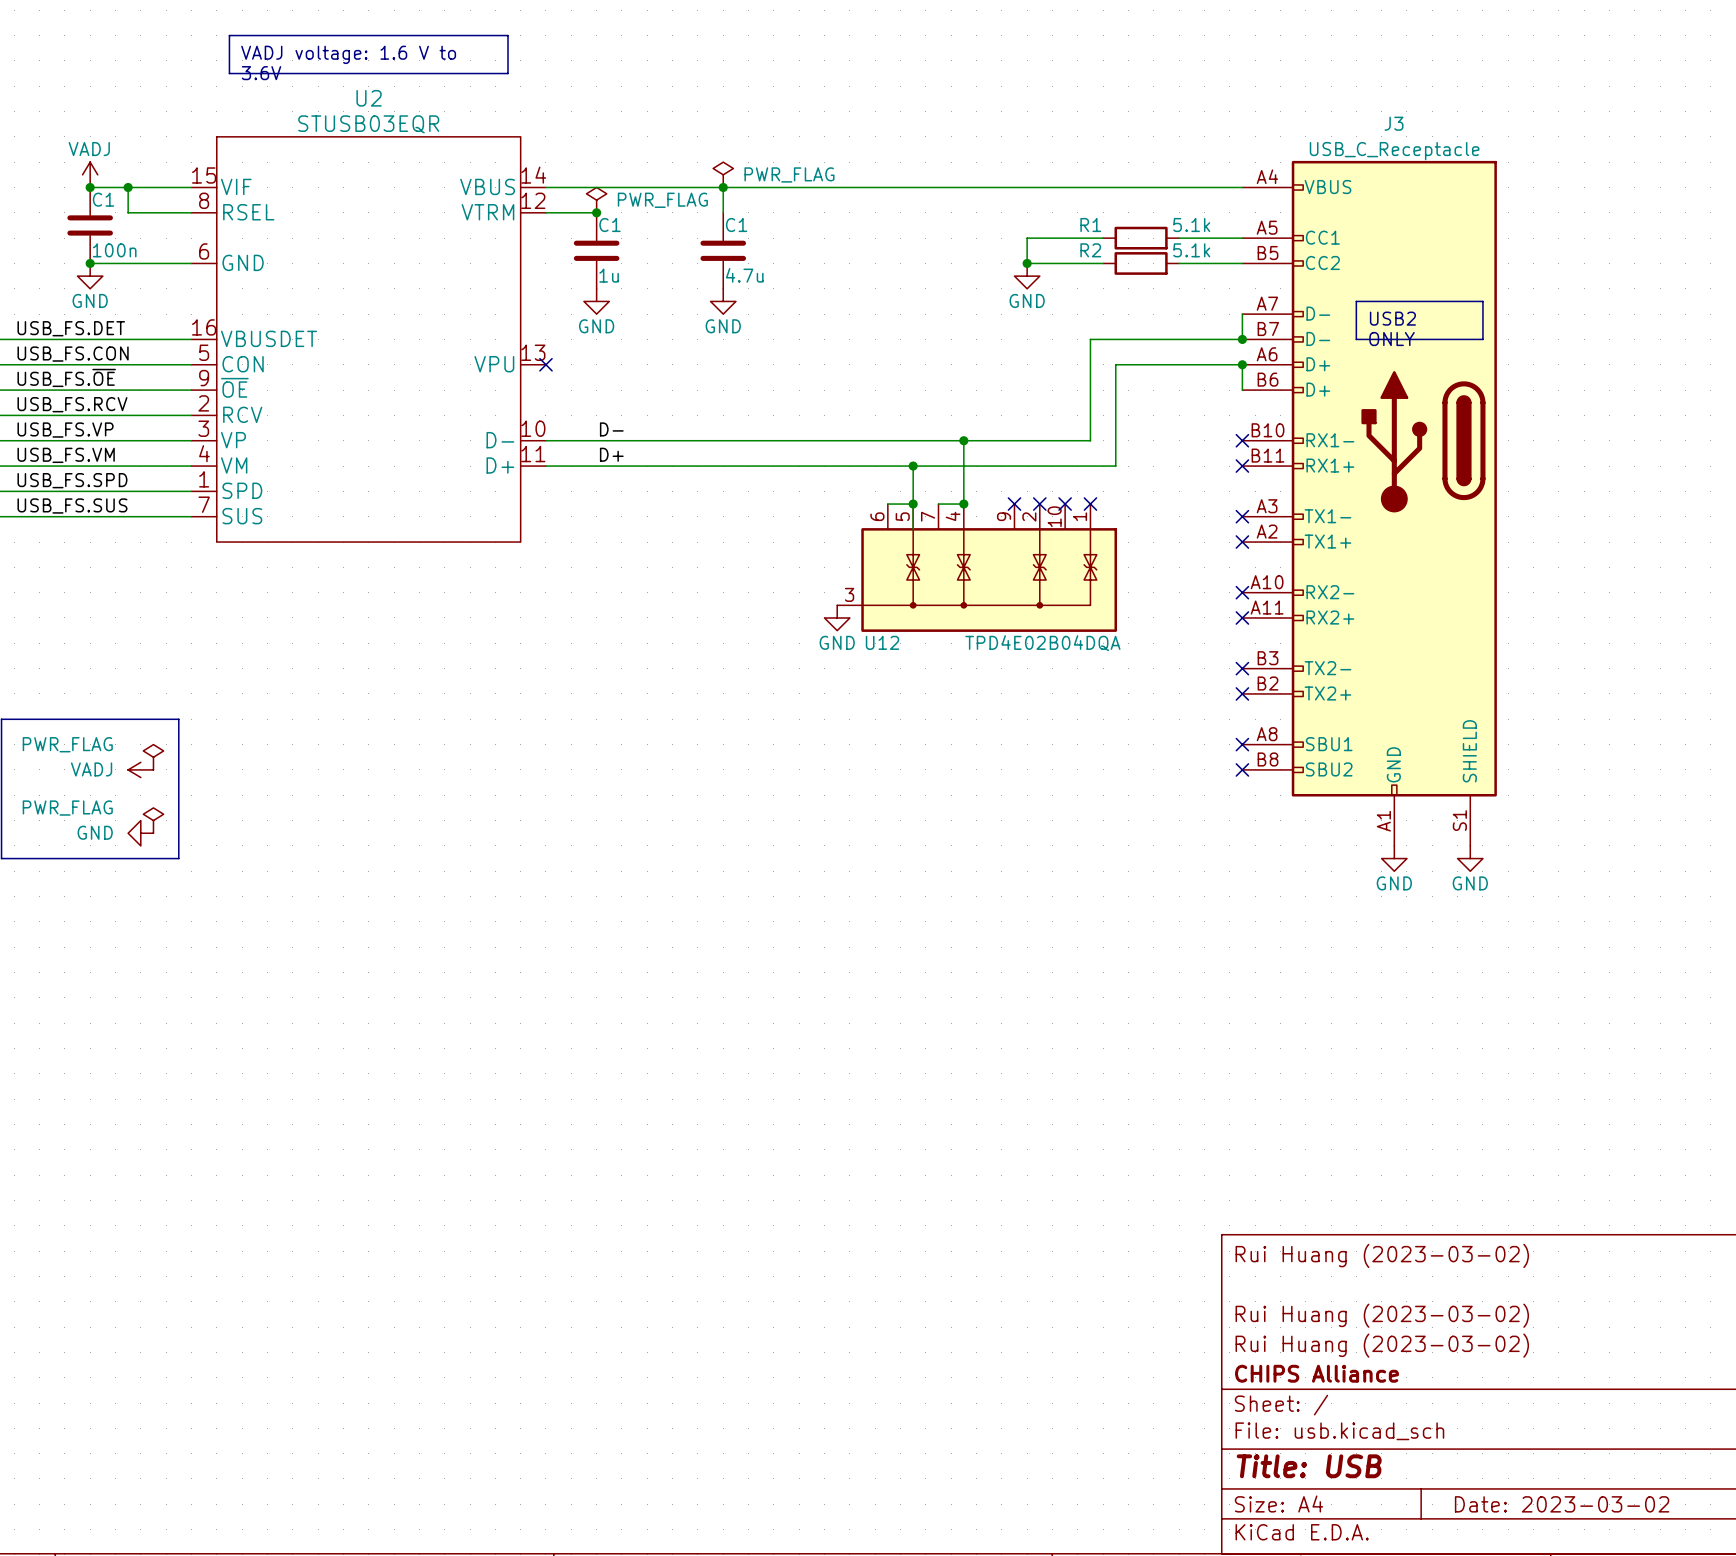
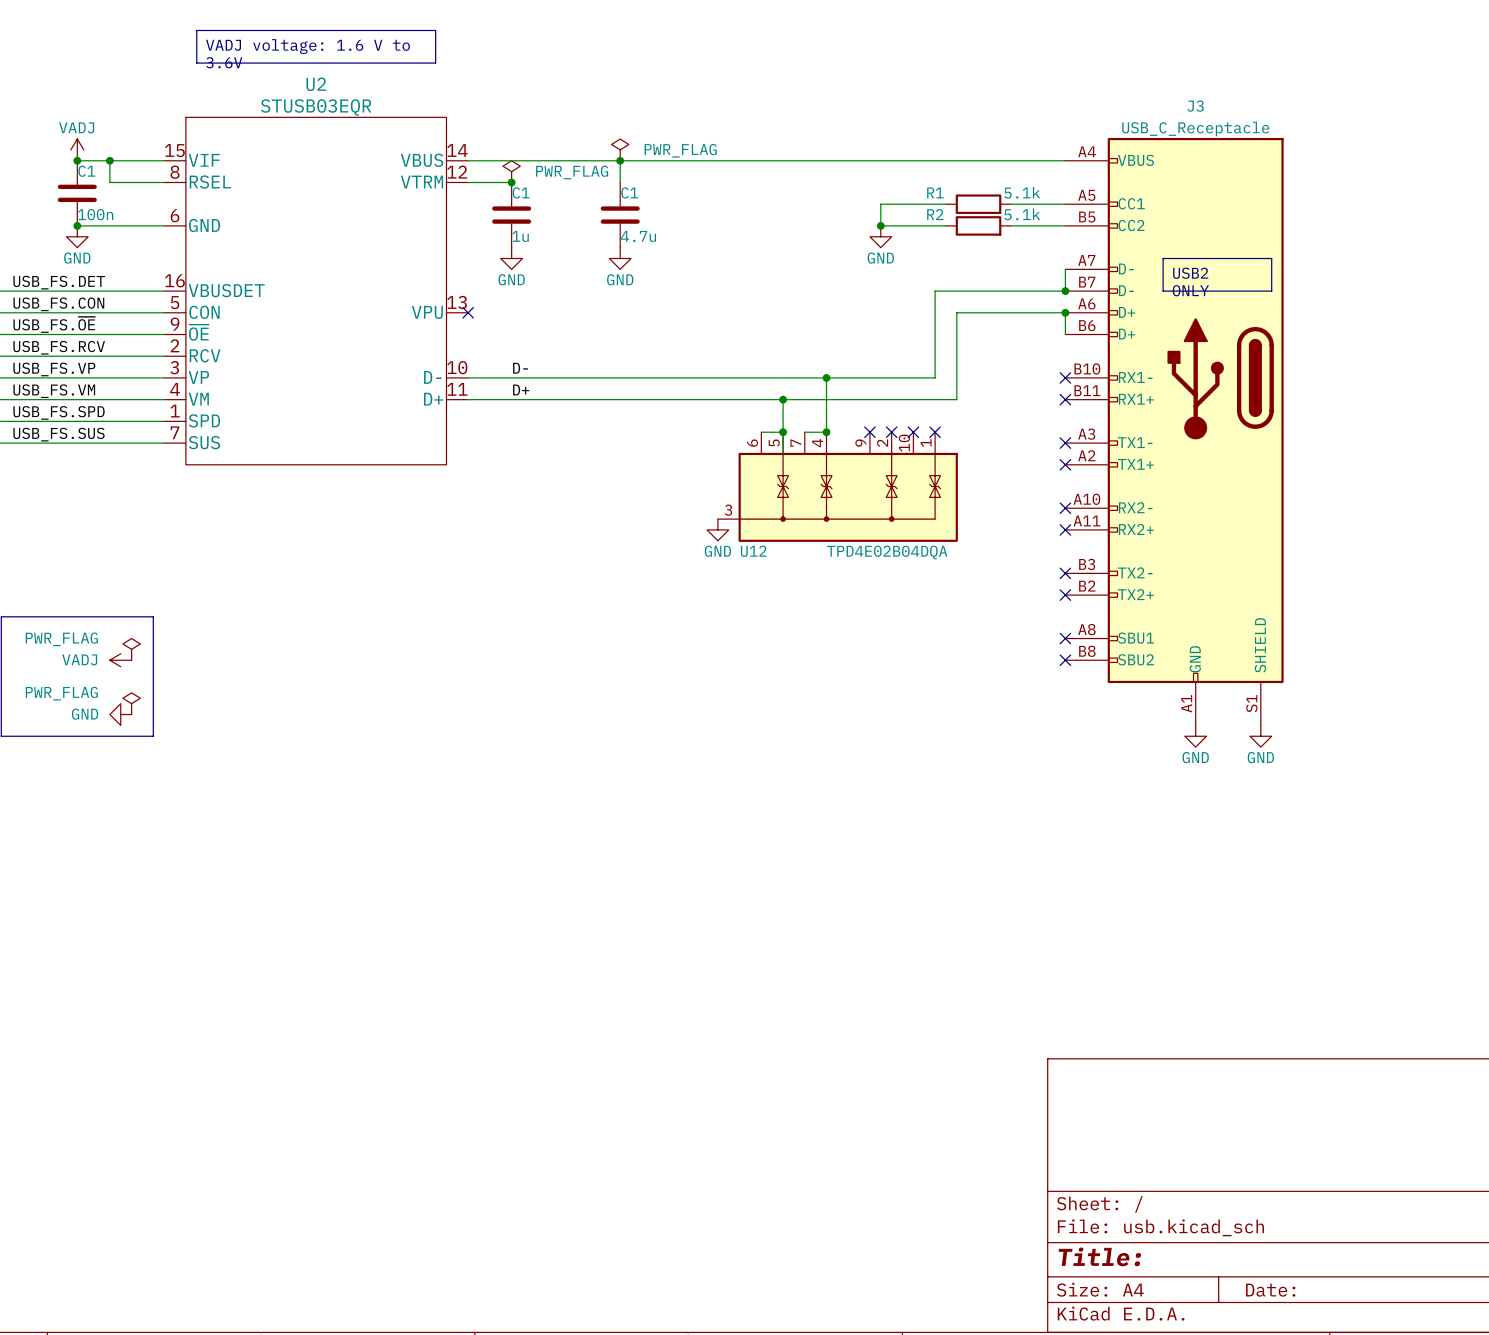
title block: Rui Huang (2023-03-02) (1382, 1255) -> none
title block: Rui Huang (2023-03-02) (1382, 1315) -> none
title block: Rui Huang (2023-03-02) (1382, 1345) -> none
title block: CHIPS Alliance (1317, 1373) -> none
title block: Title: USB (1309, 1466) -> Title: (1099, 1256)
title block: Date: 2023-03-02 (1562, 1504) -> Date: (1270, 1290)

